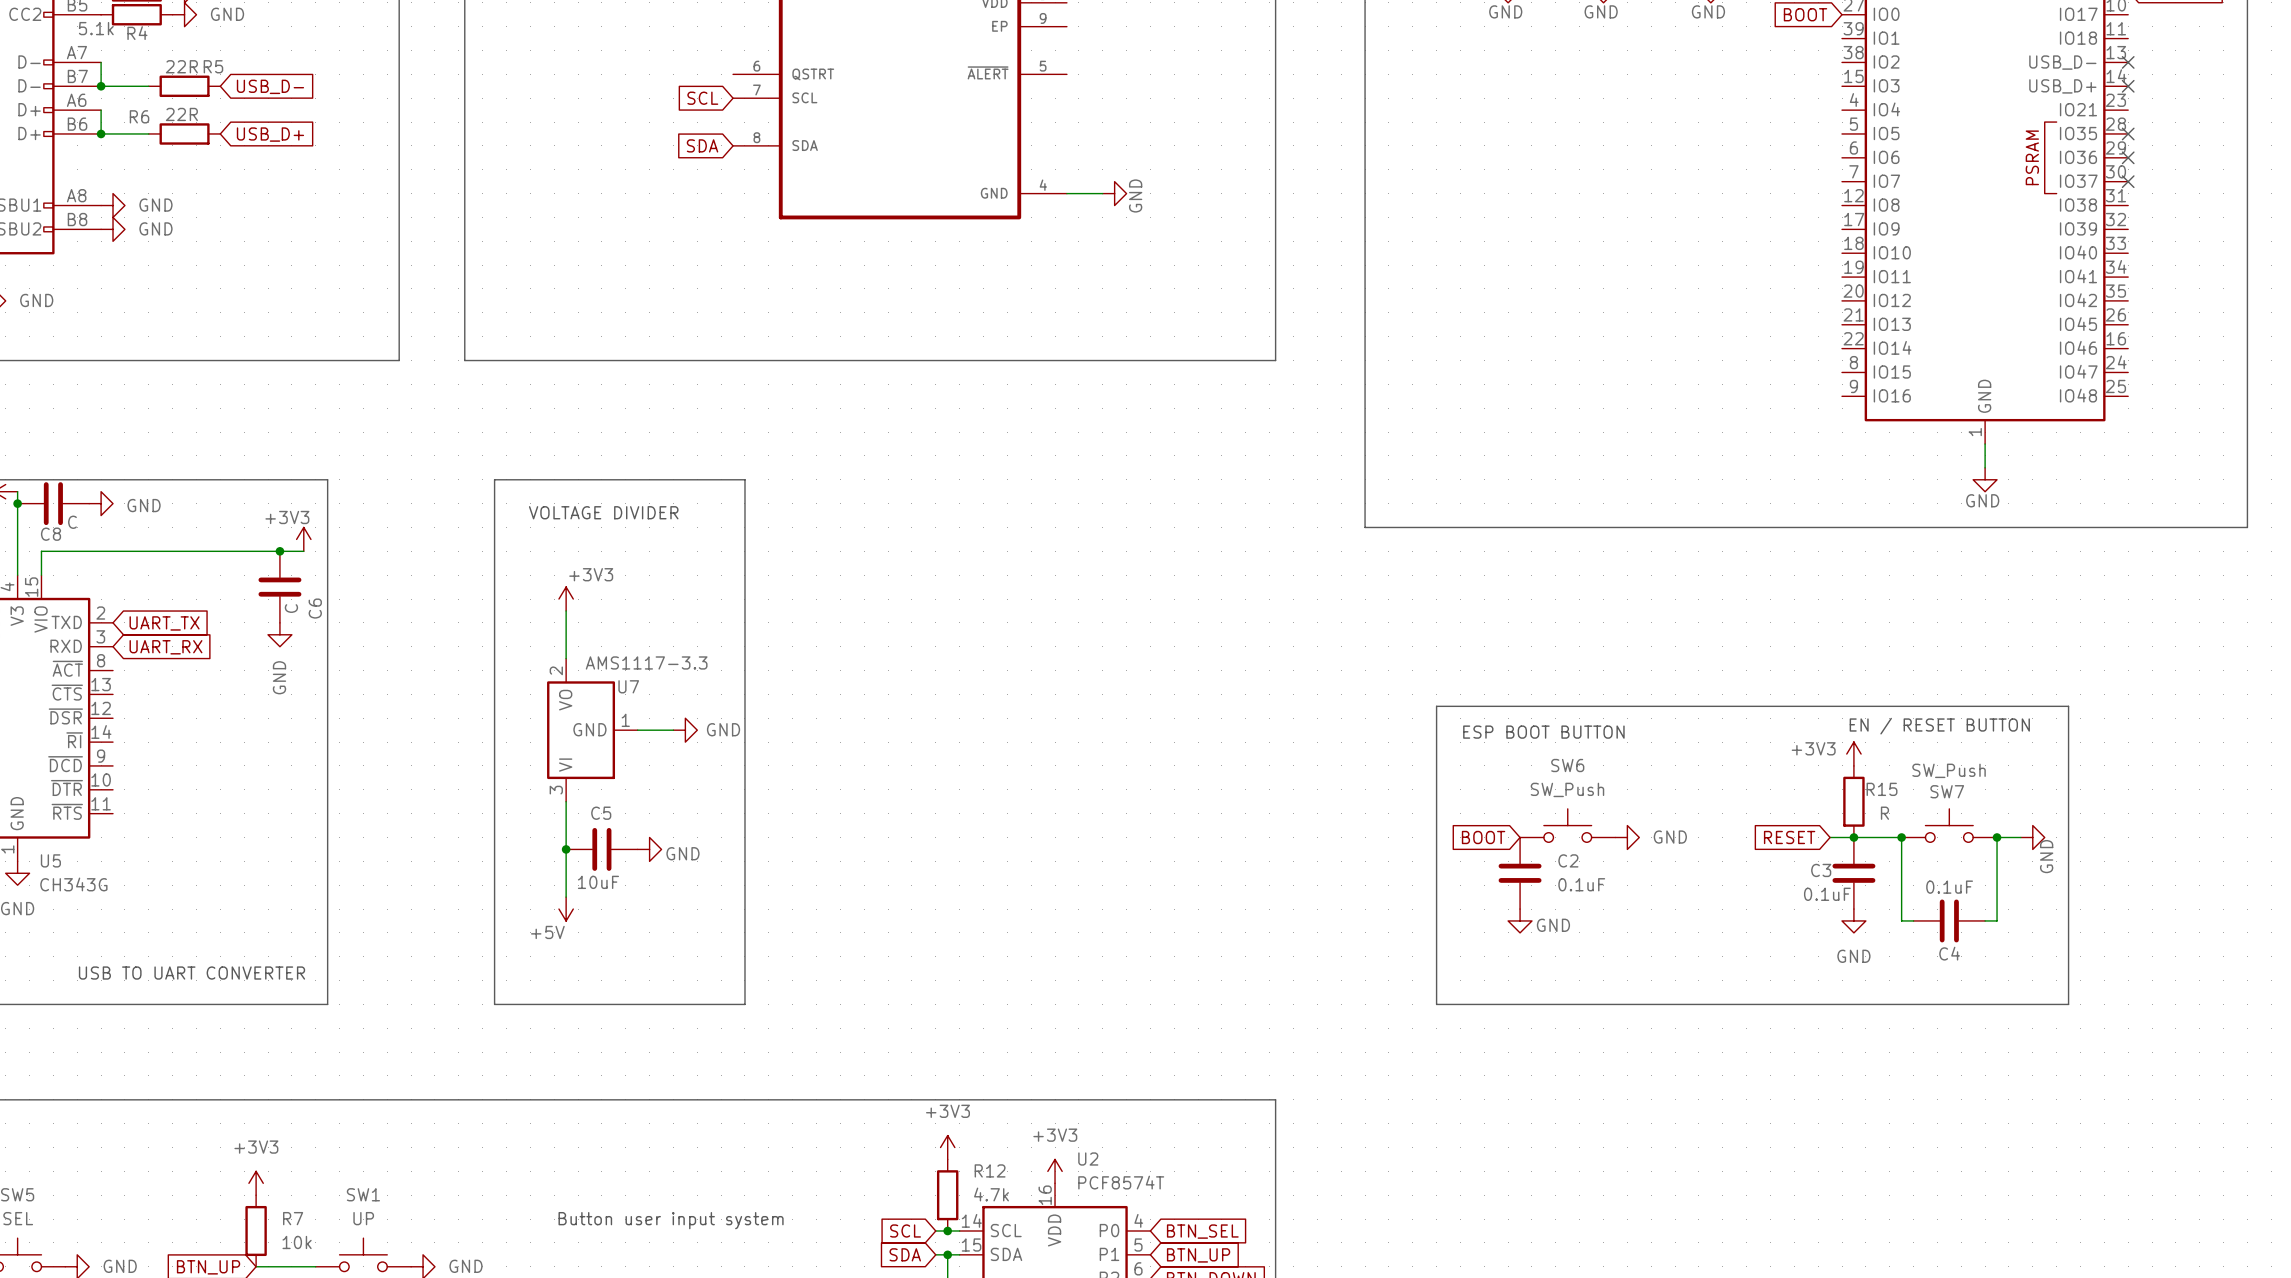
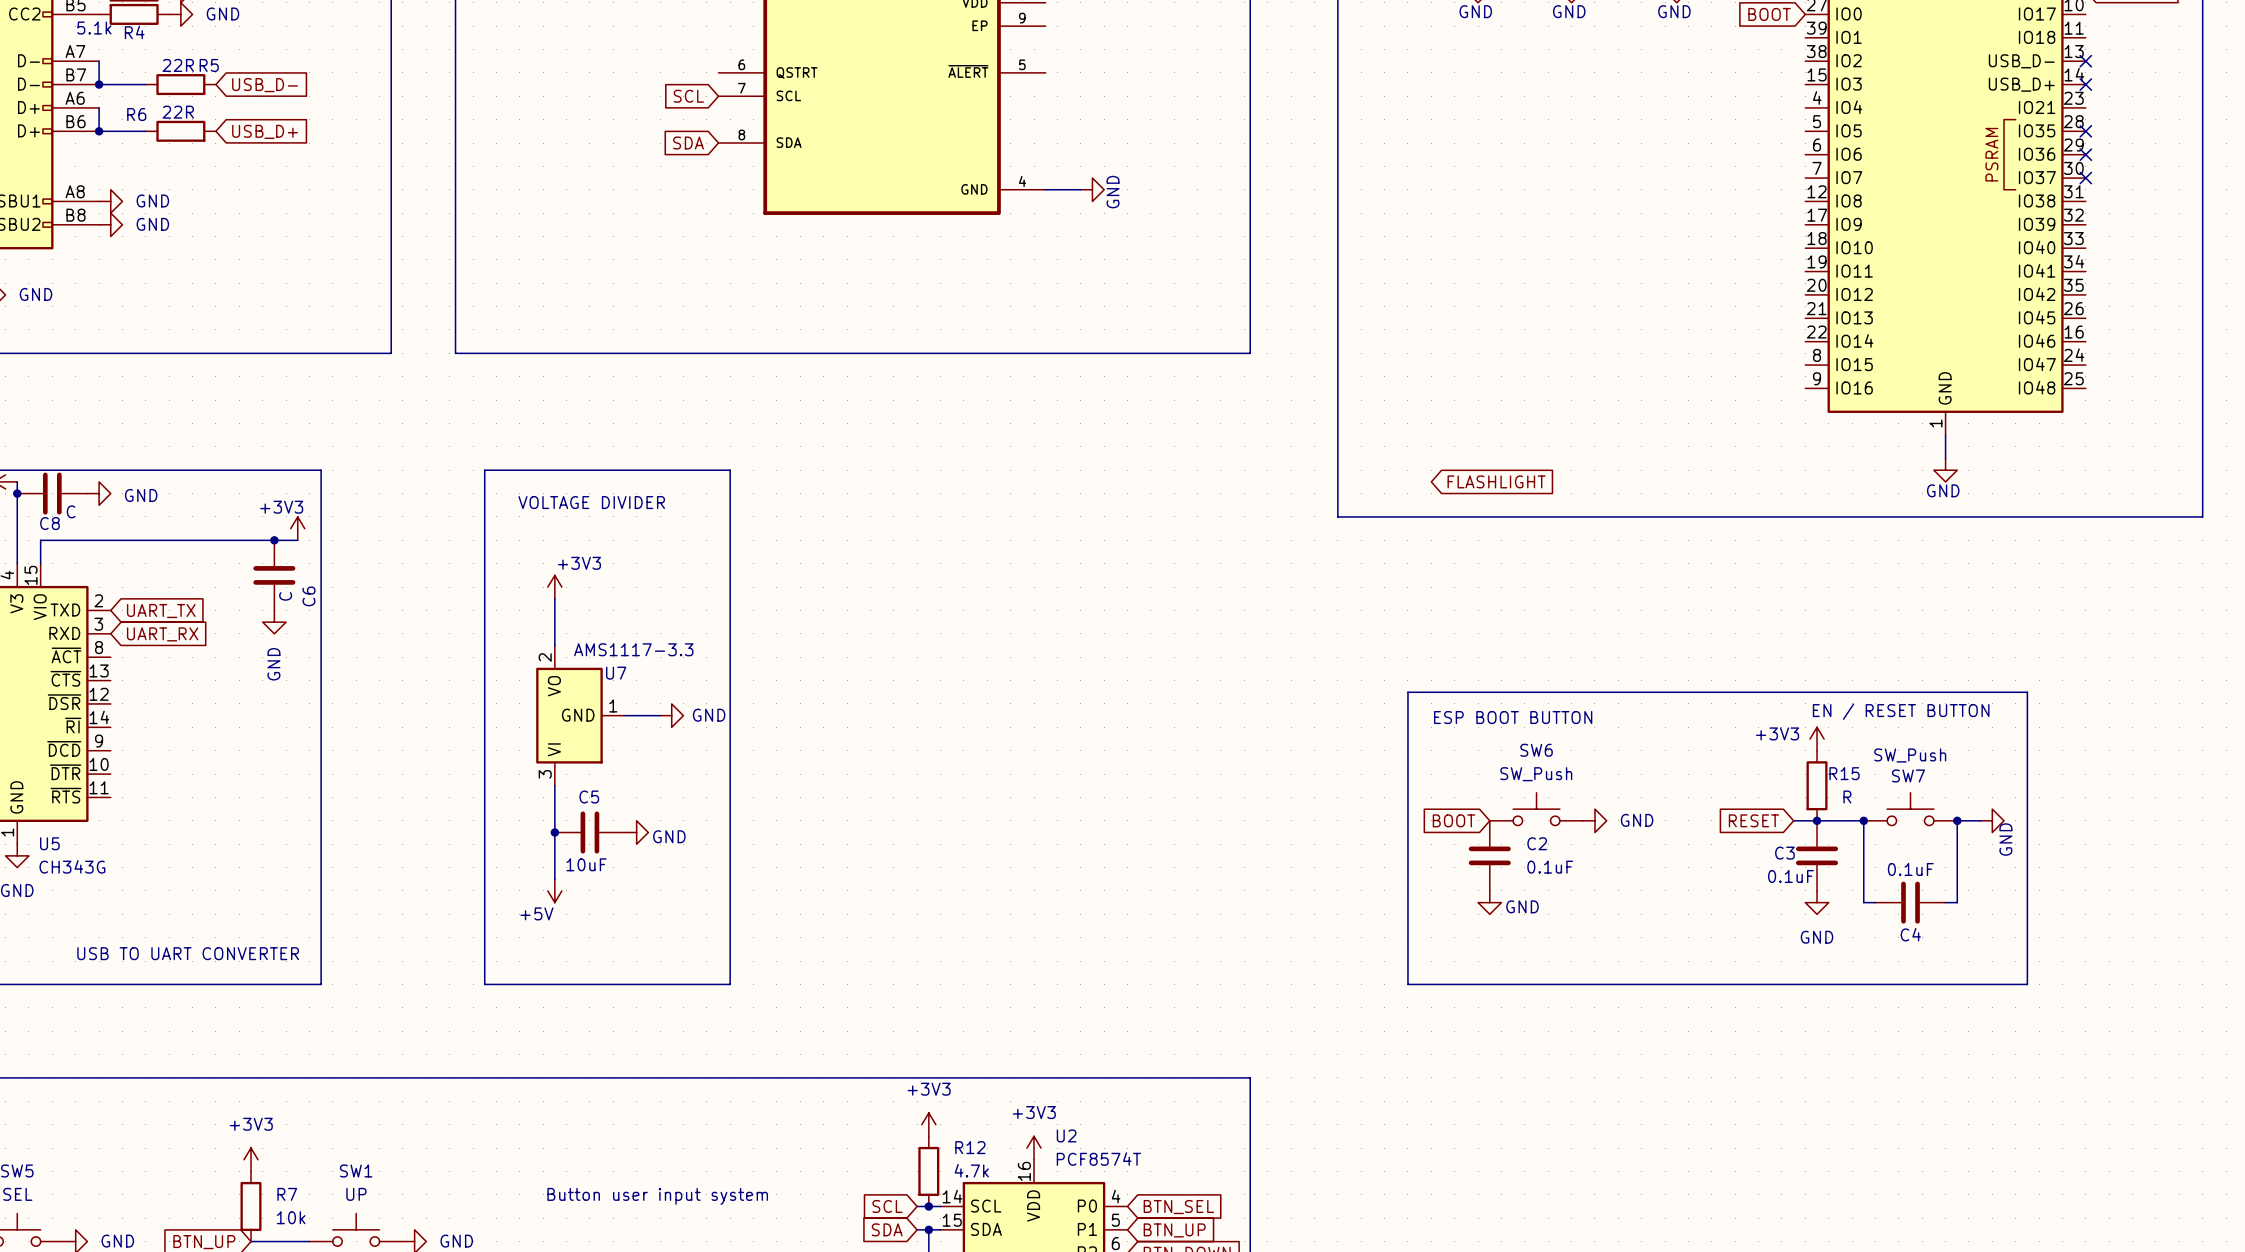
global label: none -> FLASHLIGHT (1496, 481)

